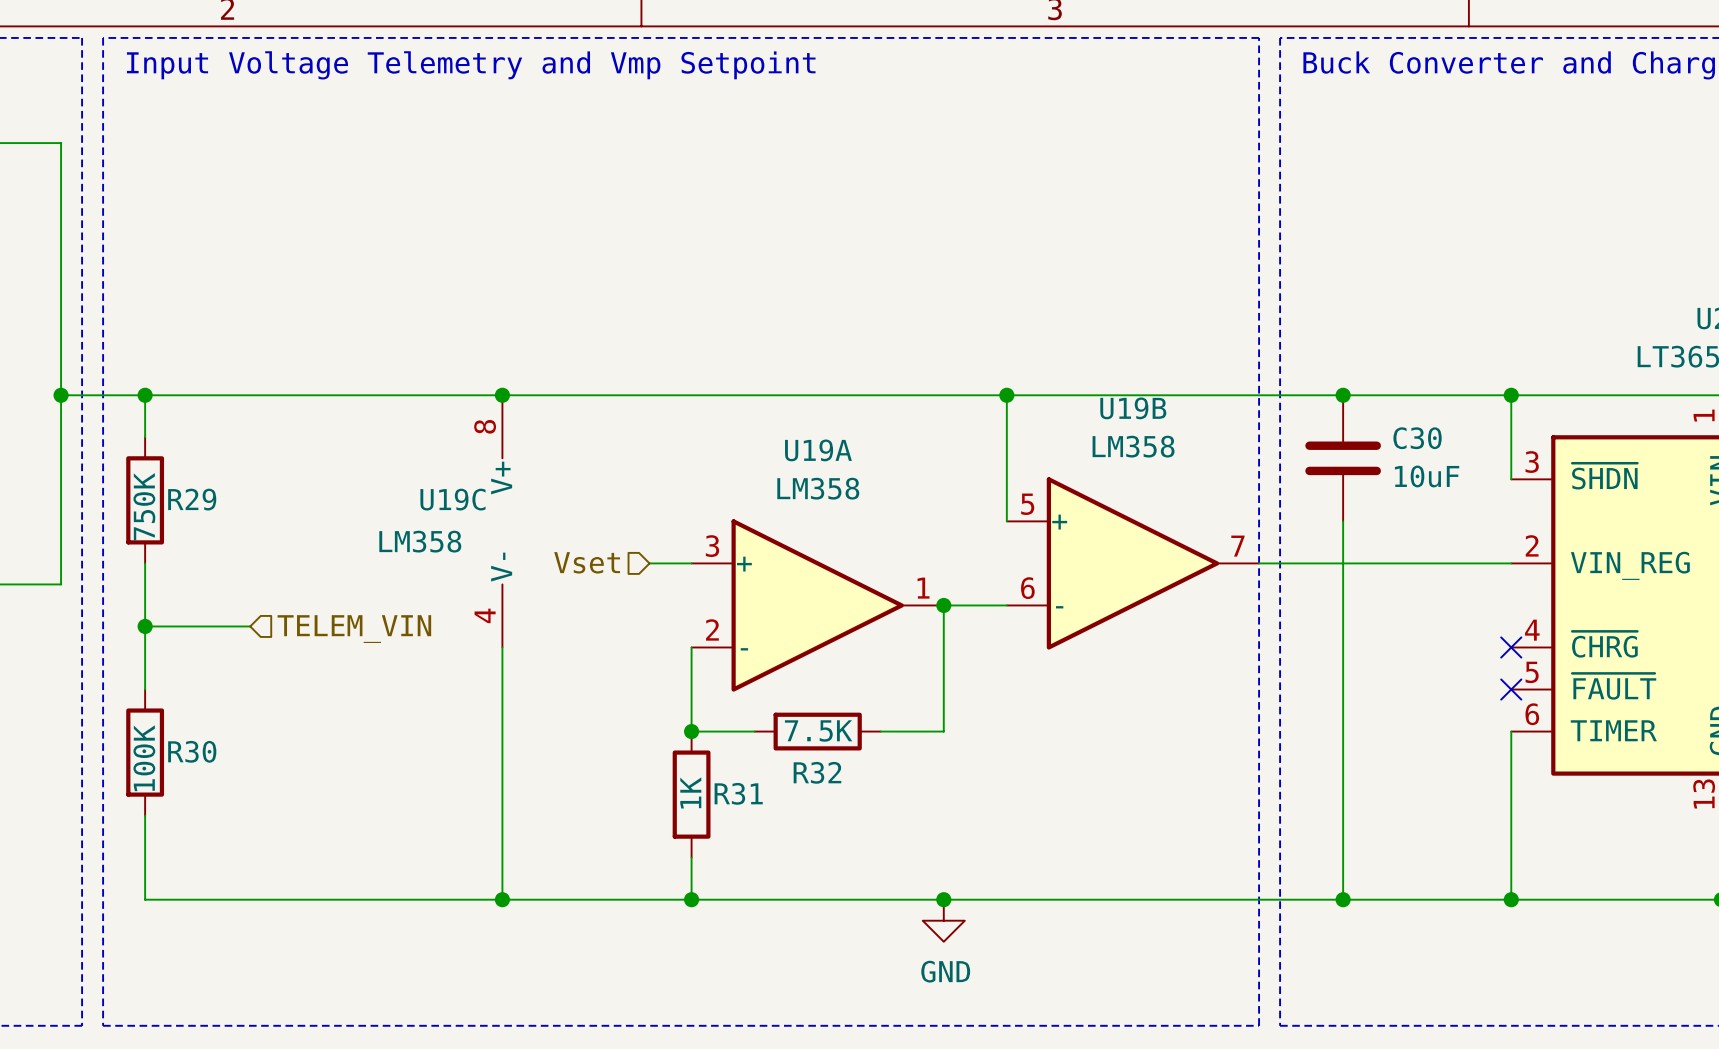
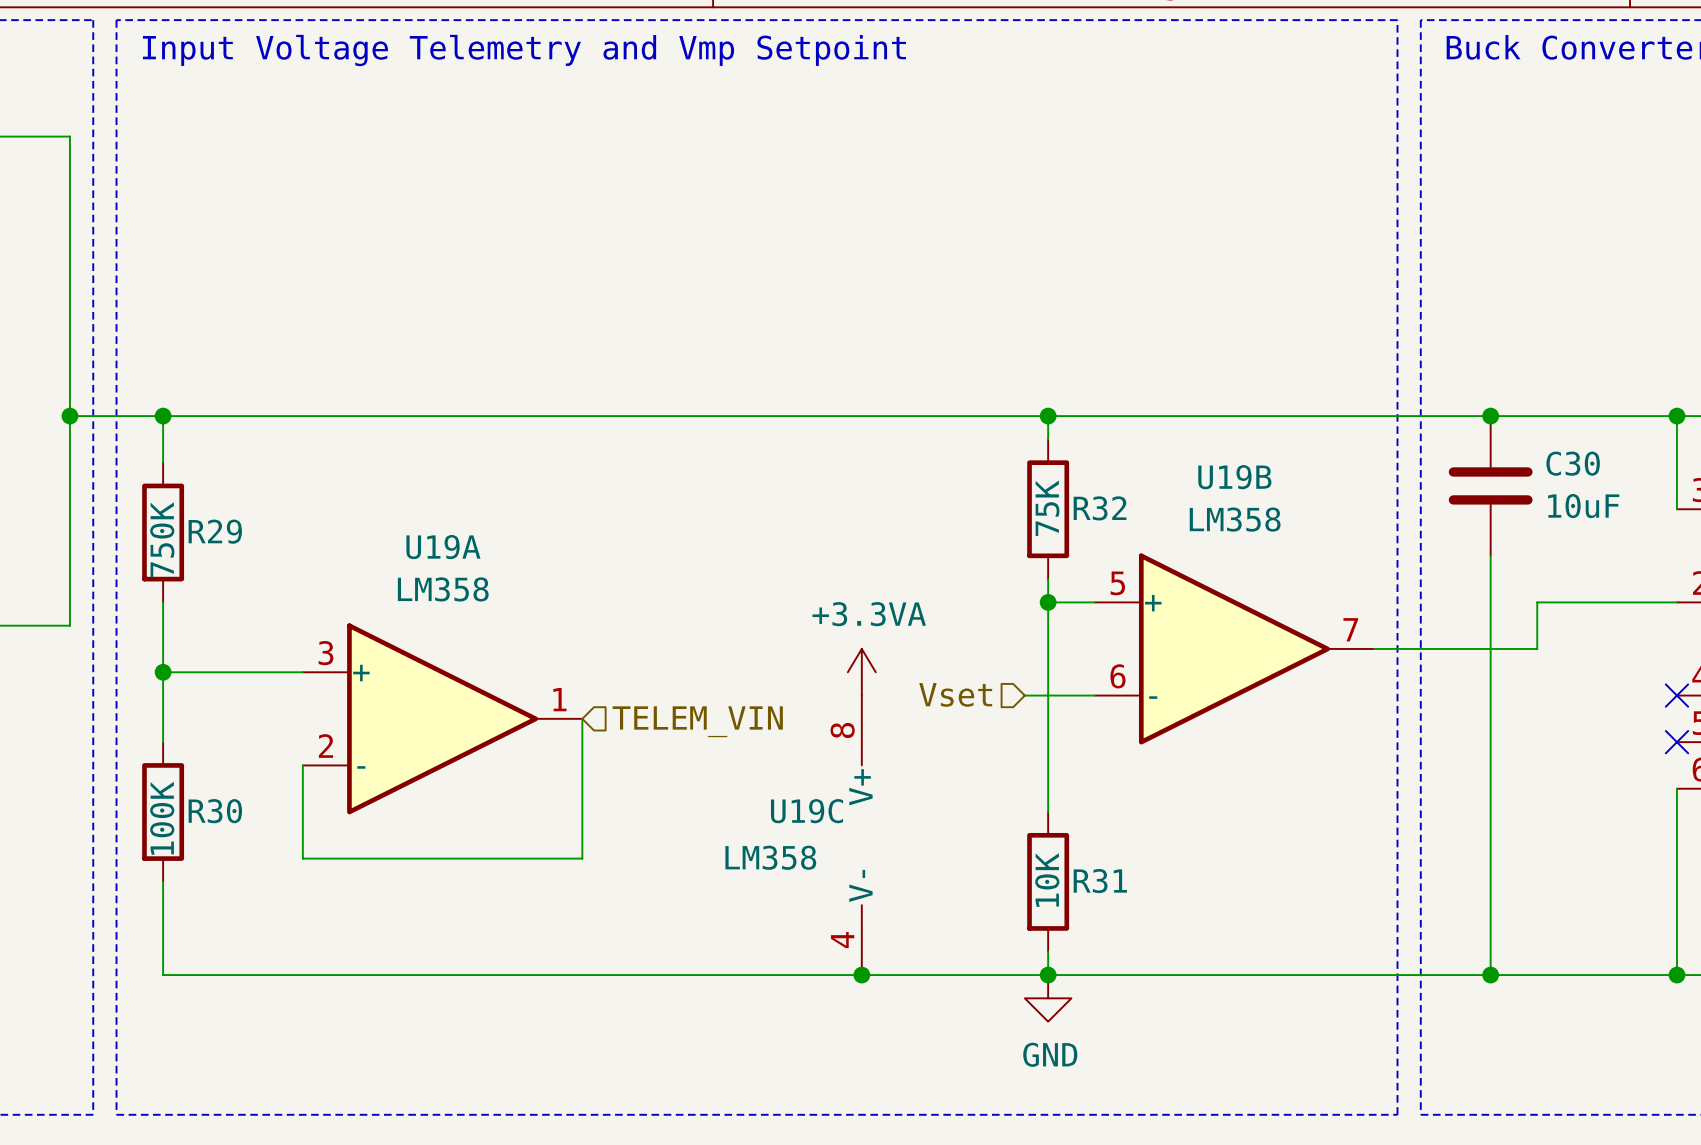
junction: (502, 395) -> none
wire: none -> (1048, 416) (1048, 439)
wire: (1006, 395) (1006, 521) -> none
junction position: (1006, 395) -> (1048, 416)
U19C position: (502, 521) -> (861, 835)
hierarchical label position: Vset (587, 562) -> Vset (955, 694)
wire: (649, 563) (691, 563) -> (1048, 602) (1094, 602)
U19B position: (1132, 563) -> (1234, 648)
wire: (1259, 563) (1385, 563) -> (1374, 648) (1537, 648) (1537, 602)
U19A position: (817, 605) -> (442, 718)
wire: (943, 605) (1006, 605) -> (1048, 648) (1048, 579)
junction position: (943, 605) -> (1048, 602)
wire: none -> (279, 672) (302, 672)
power symbol: none -> +3.3VA (861, 672)
hierarchical label position: TELEM_VIN (354, 629) -> TELEM_VIN (697, 721)
wire: (502, 647) (502, 899) -> none
wire: (691, 647) (691, 731) (754, 731) -> none
wire: none -> (1024, 695) (1094, 695)
wire: none -> (582, 718) (582, 858) (302, 858) (302, 765)
R32 value: 7.5K (818, 730) -> 75K (1047, 508)
junction: (691, 731) -> none
R32 rotation: 0° (817, 731) -> 90° clockwise (1048, 509)
R32 position: (817, 731) -> (1048, 509)
wire: (880, 731) (943, 731) -> (1048, 812) (1048, 788)
R32 name position: R32 (817, 772) -> R32 (1100, 508)
R31 value: 1K (690, 792) -> 10K (1047, 880)
R31 position: (691, 794) -> (1048, 881)
wire: (691, 857) (691, 899) -> none
wire: none -> (1048, 951) (1048, 975)
junction: (502, 899) -> none
junction position: (691, 899) -> (861, 975)

